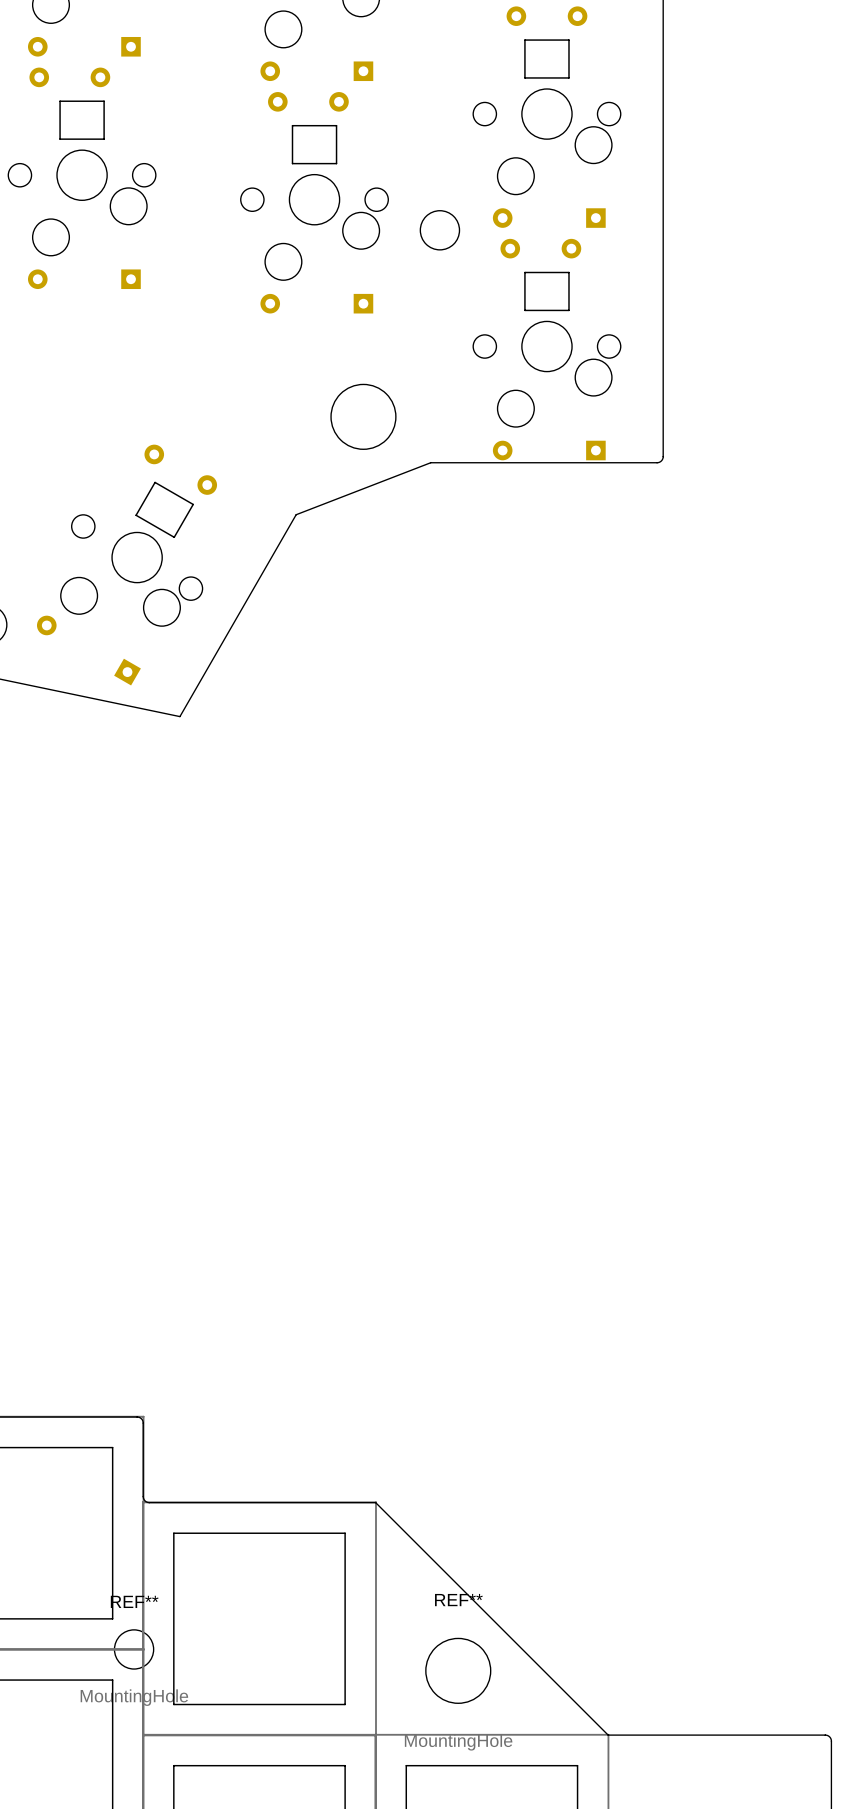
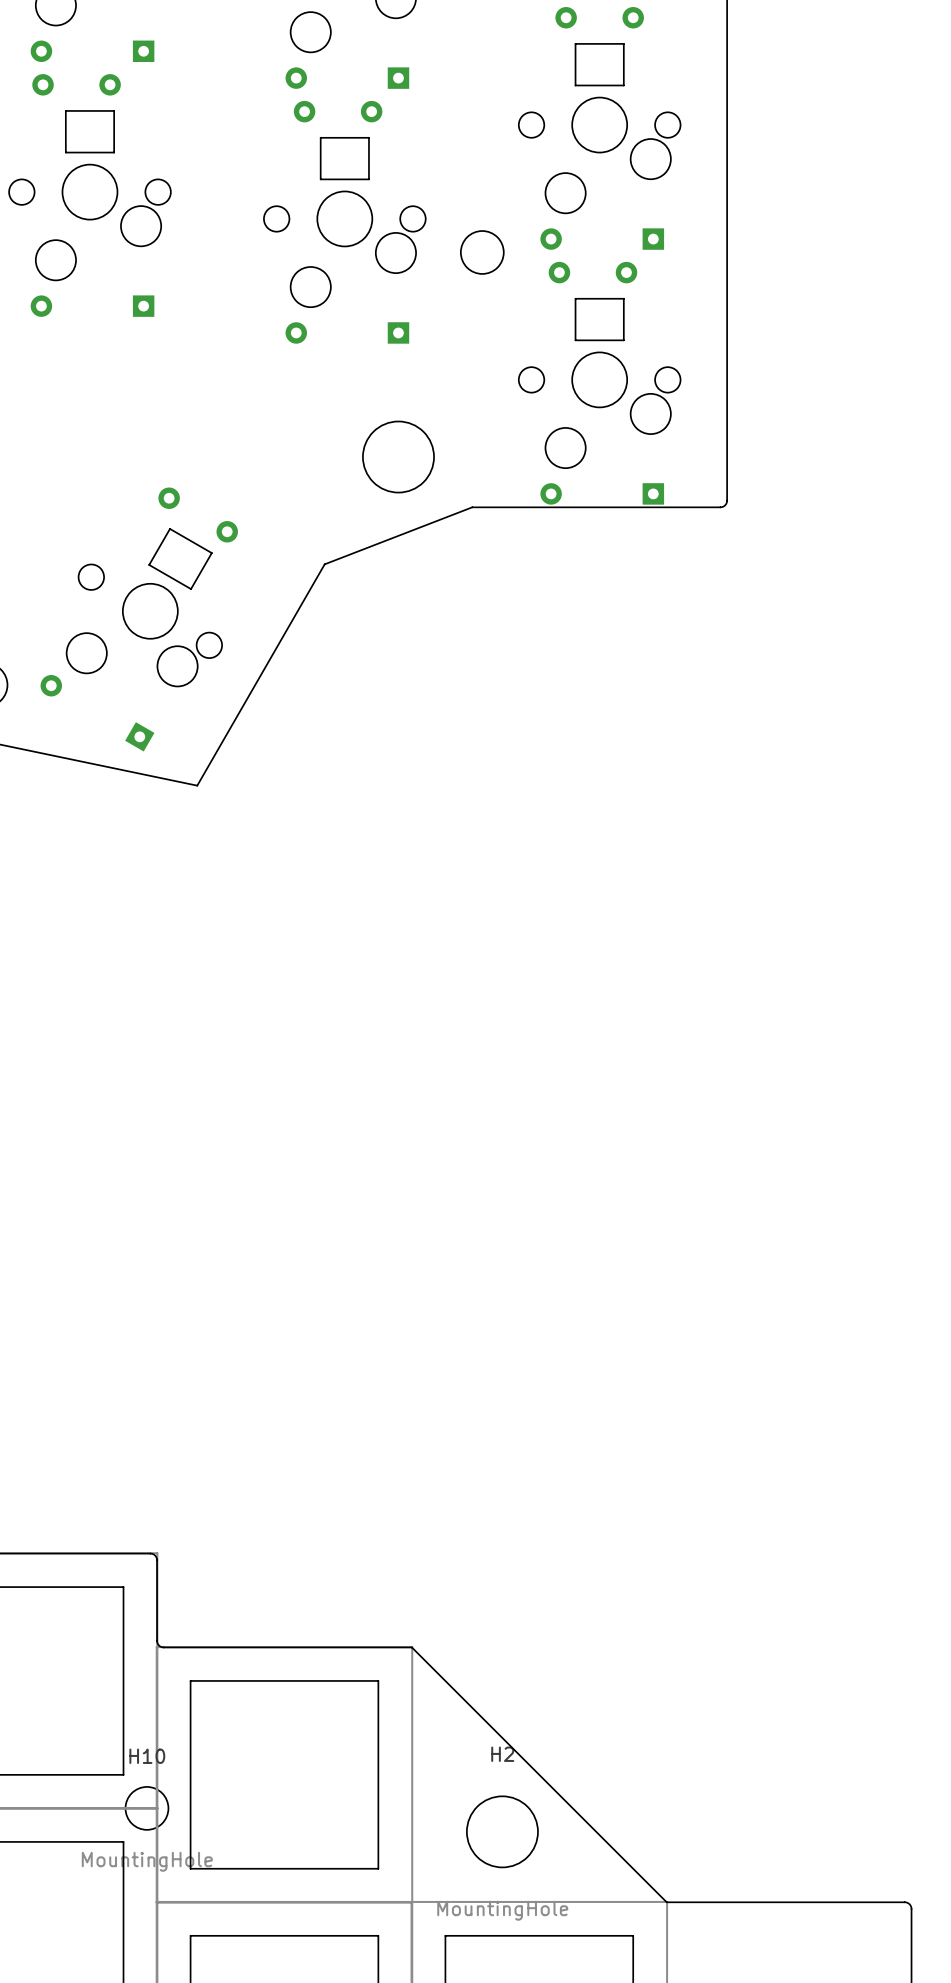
REF** name: REF** (458, 1600) -> H2 (502, 1754)
REF** name: REF** (134, 1601) -> H10 (147, 1756)

